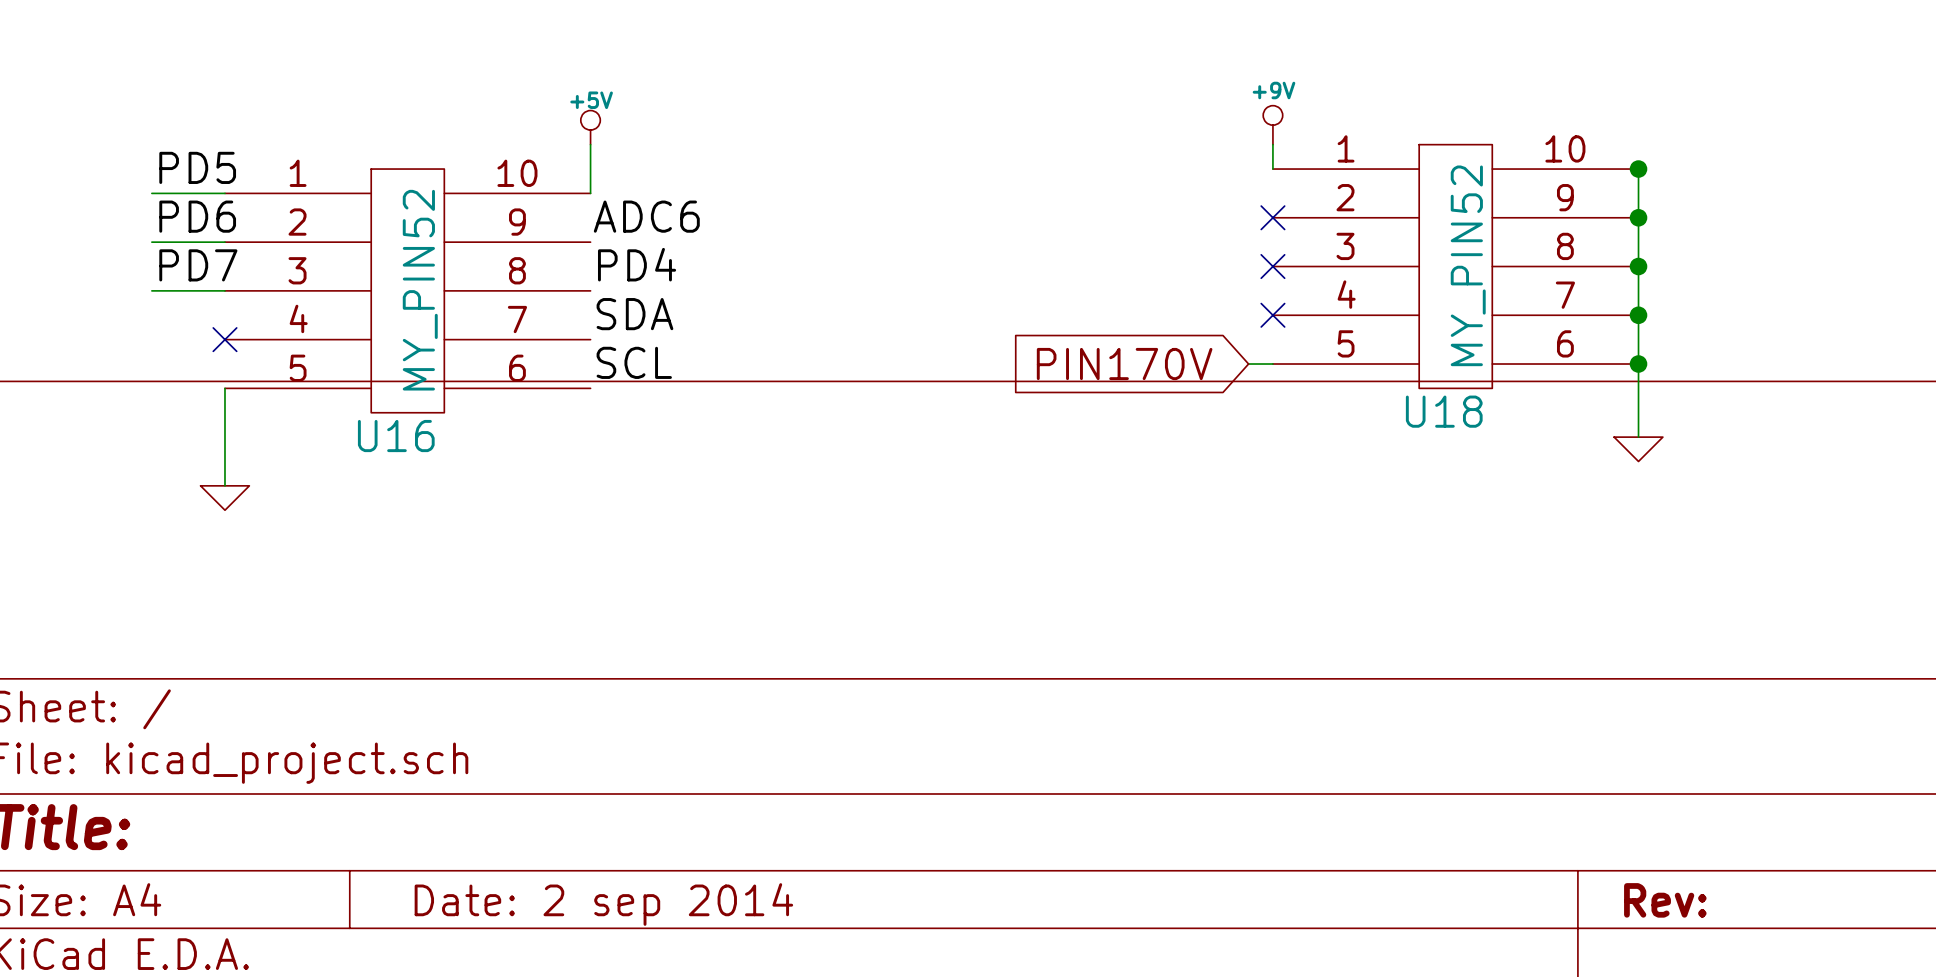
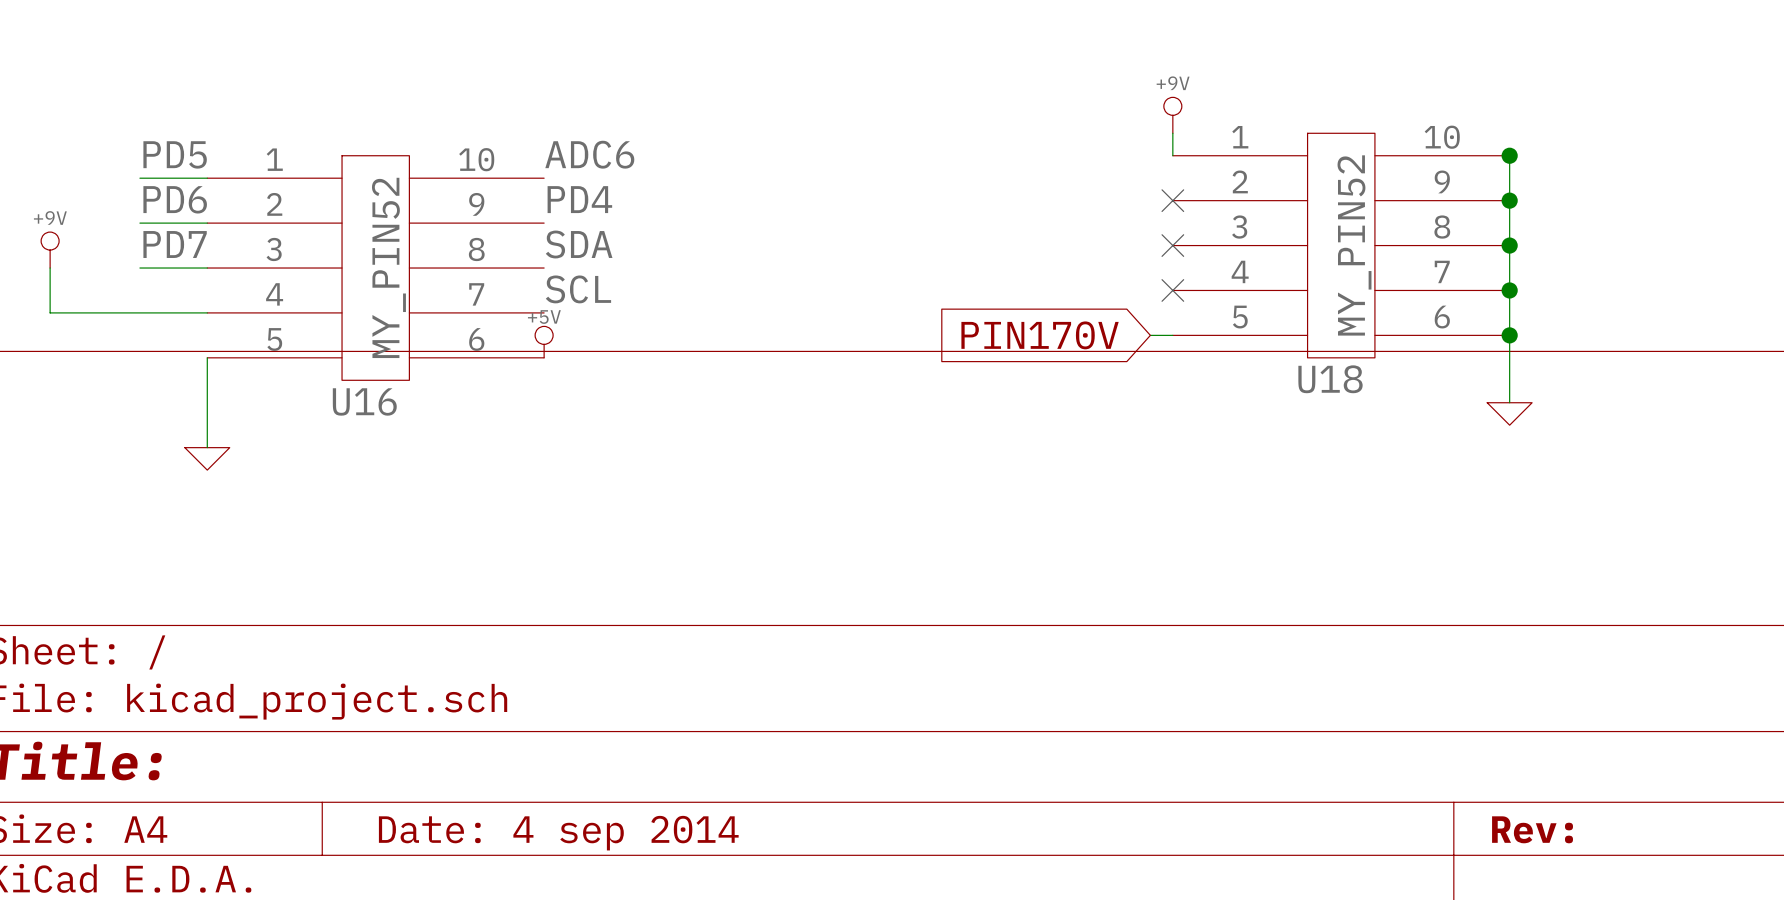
power symbol position: +5V (590, 127) -> +5V (544, 342)
wire: (590, 144) (590, 193) -> none
label: none -> ADC6 (589, 154)
label: ADC6 (646, 216) -> PD4 (579, 199)
label: PD4 (637, 264) -> SDA (579, 244)
power symbol: none -> +9V (50, 250)
wire: none -> (50, 268) (50, 312) (207, 312)
label: SDA (634, 314) -> SCL (578, 289)
no-connect mark: (224, 339) -> none
label: SCL (634, 362) -> none
title block: Date: 2 sep 2014 (603, 904) -> Date: 4 sep 2014 (558, 833)

